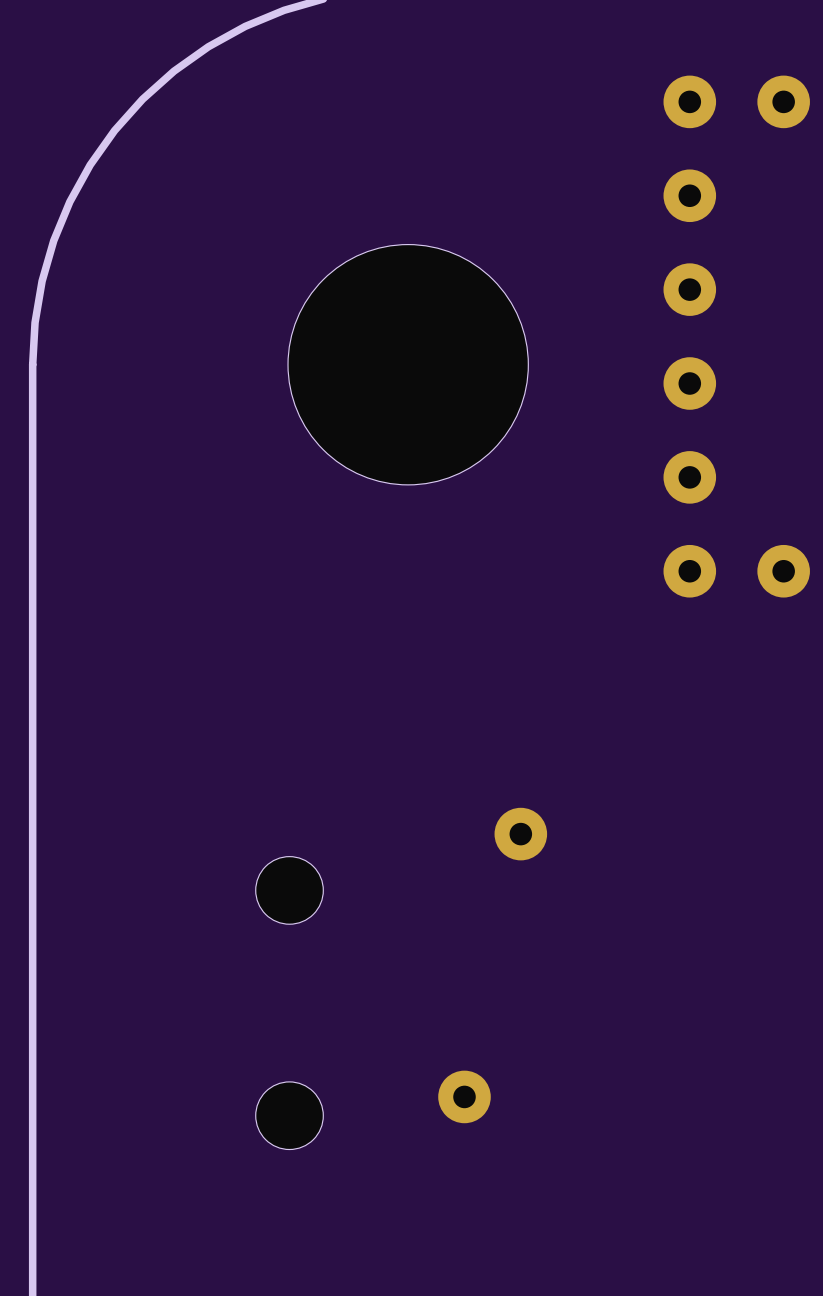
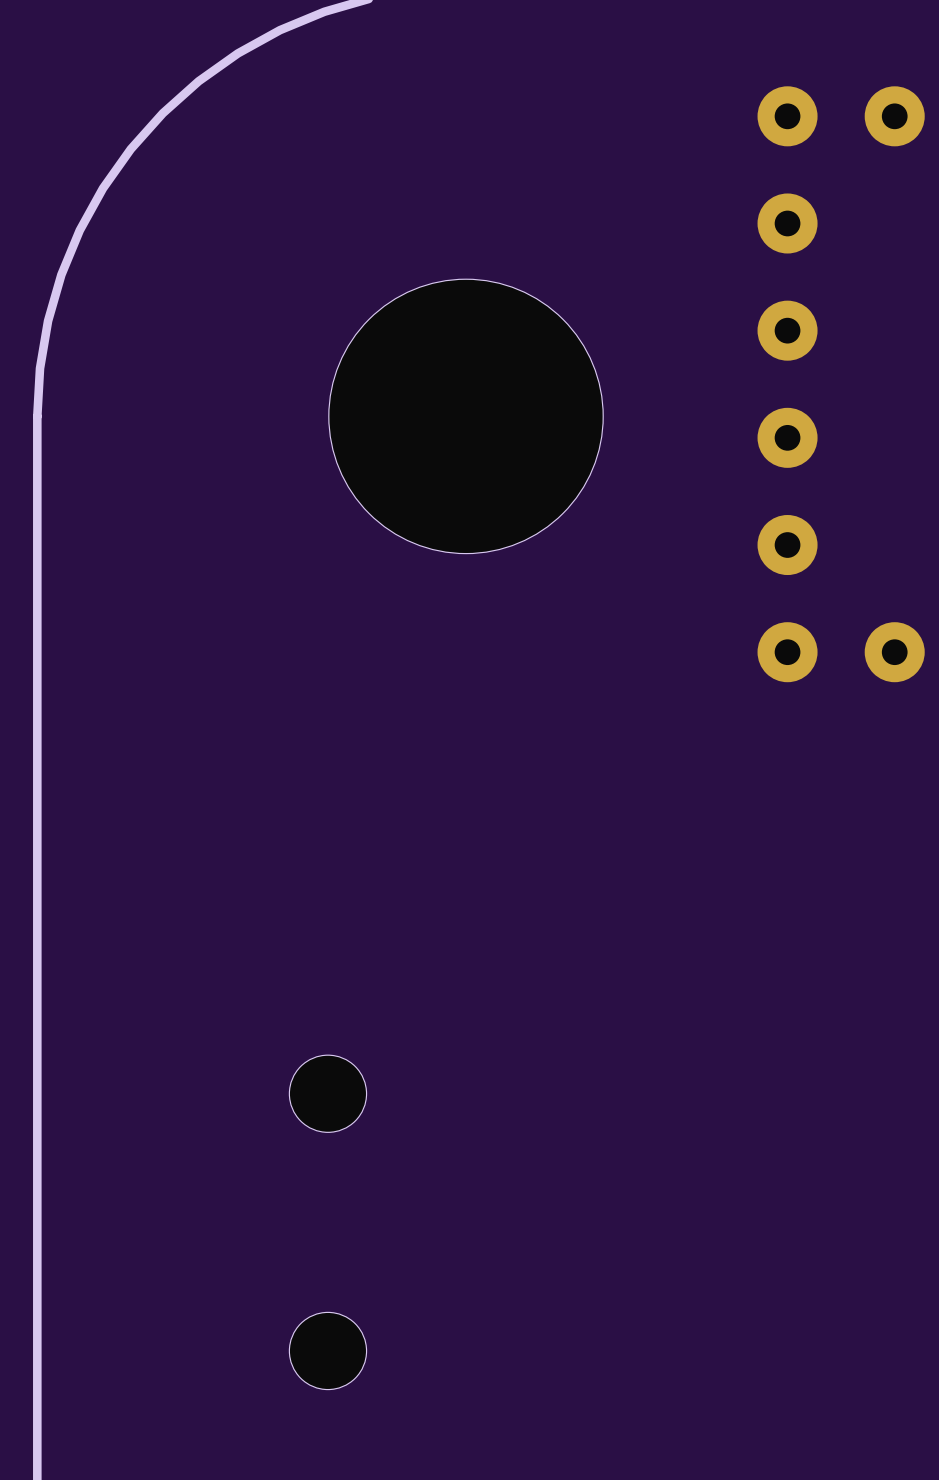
via: (520, 834) -> none
part position: (289, 1003) -> (327, 1222)
via: (464, 1096) -> none

